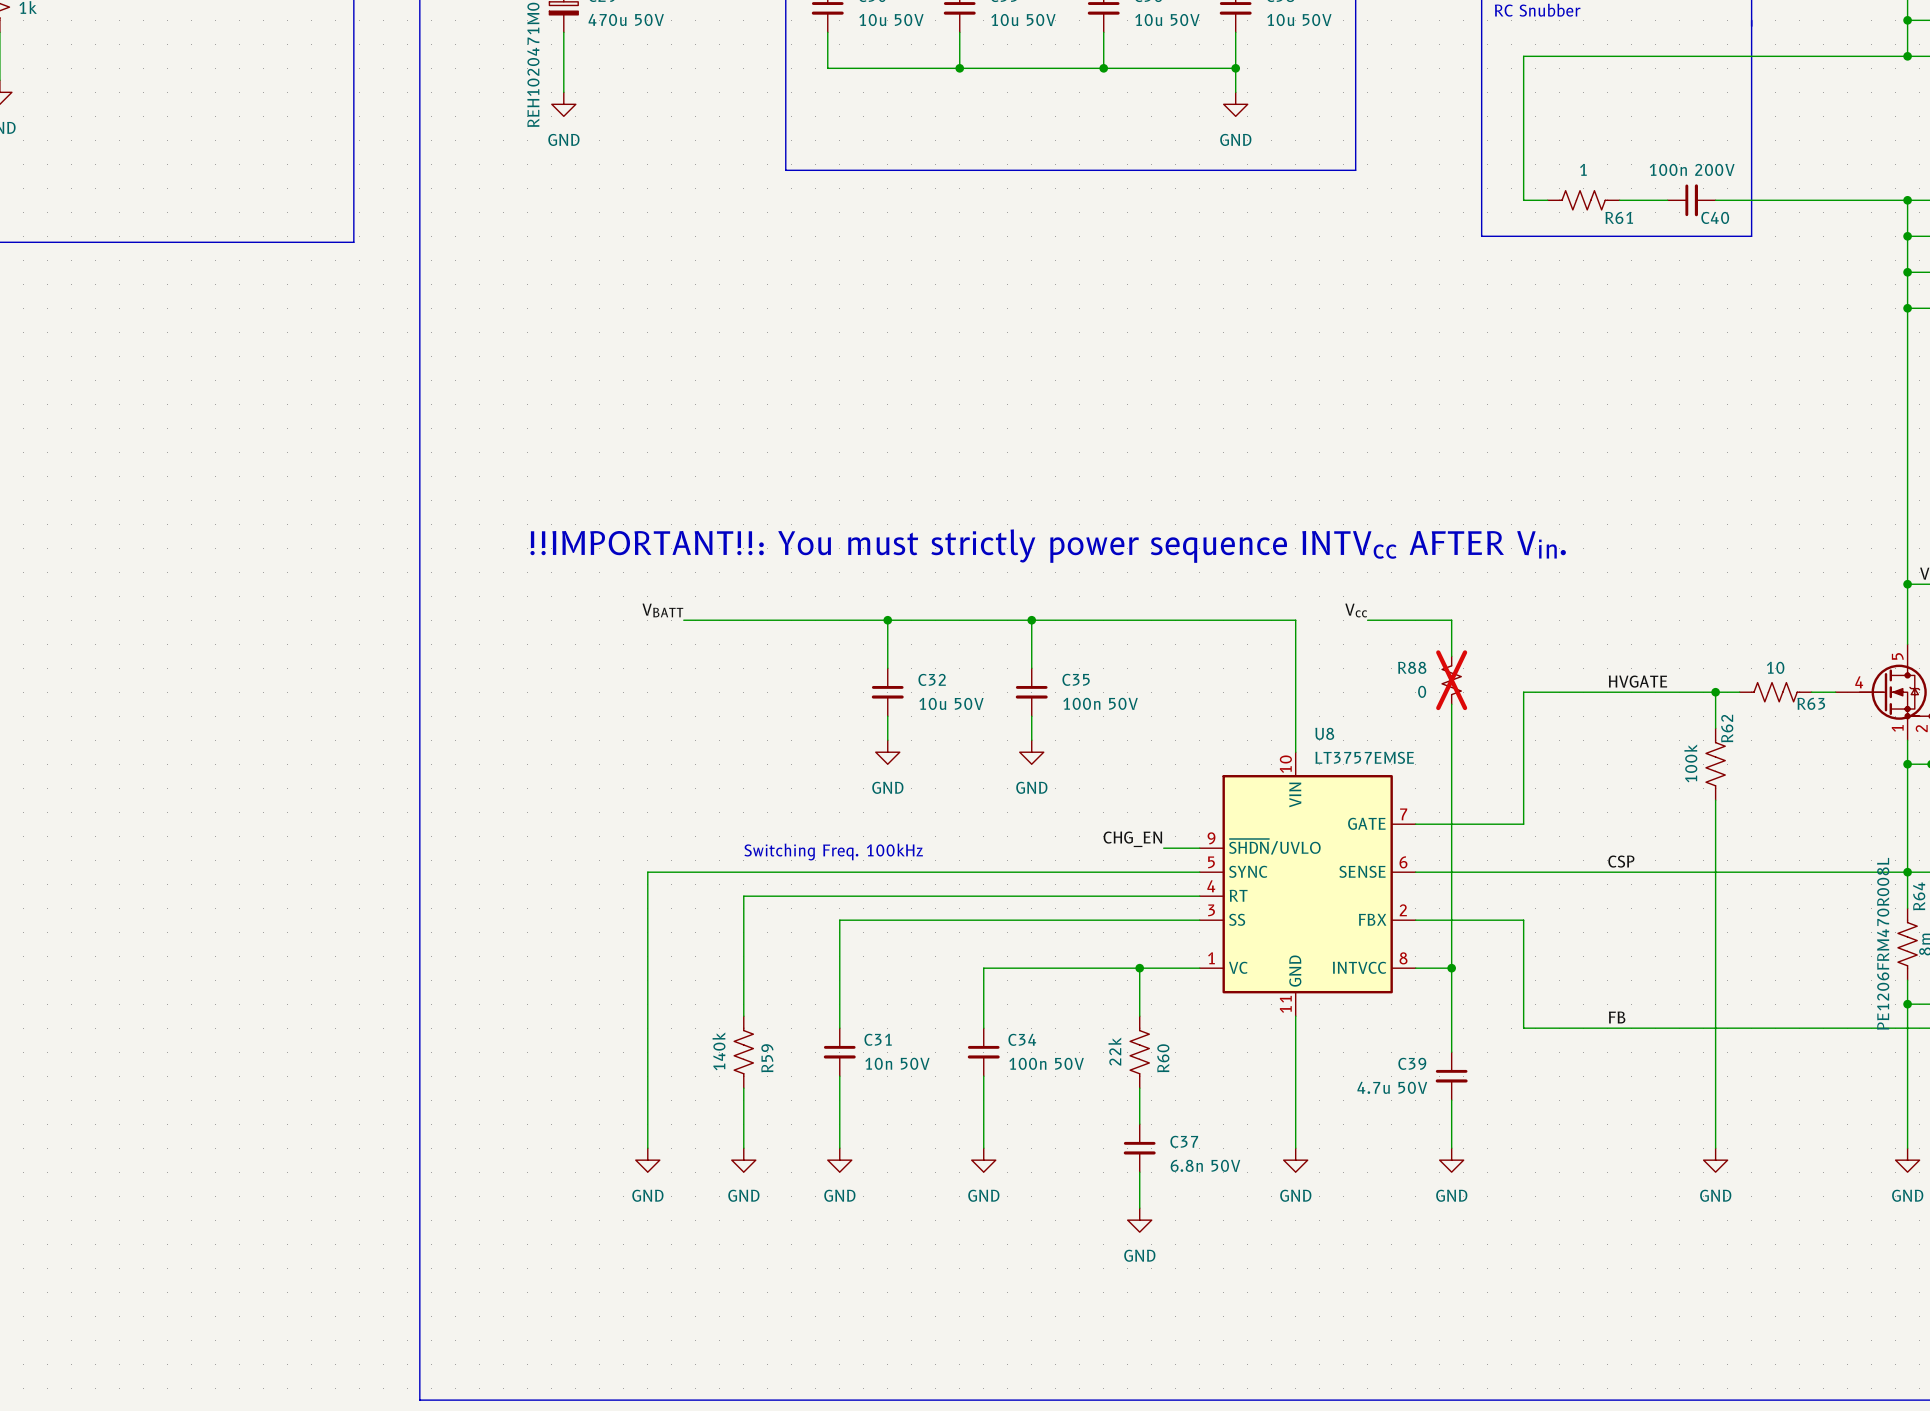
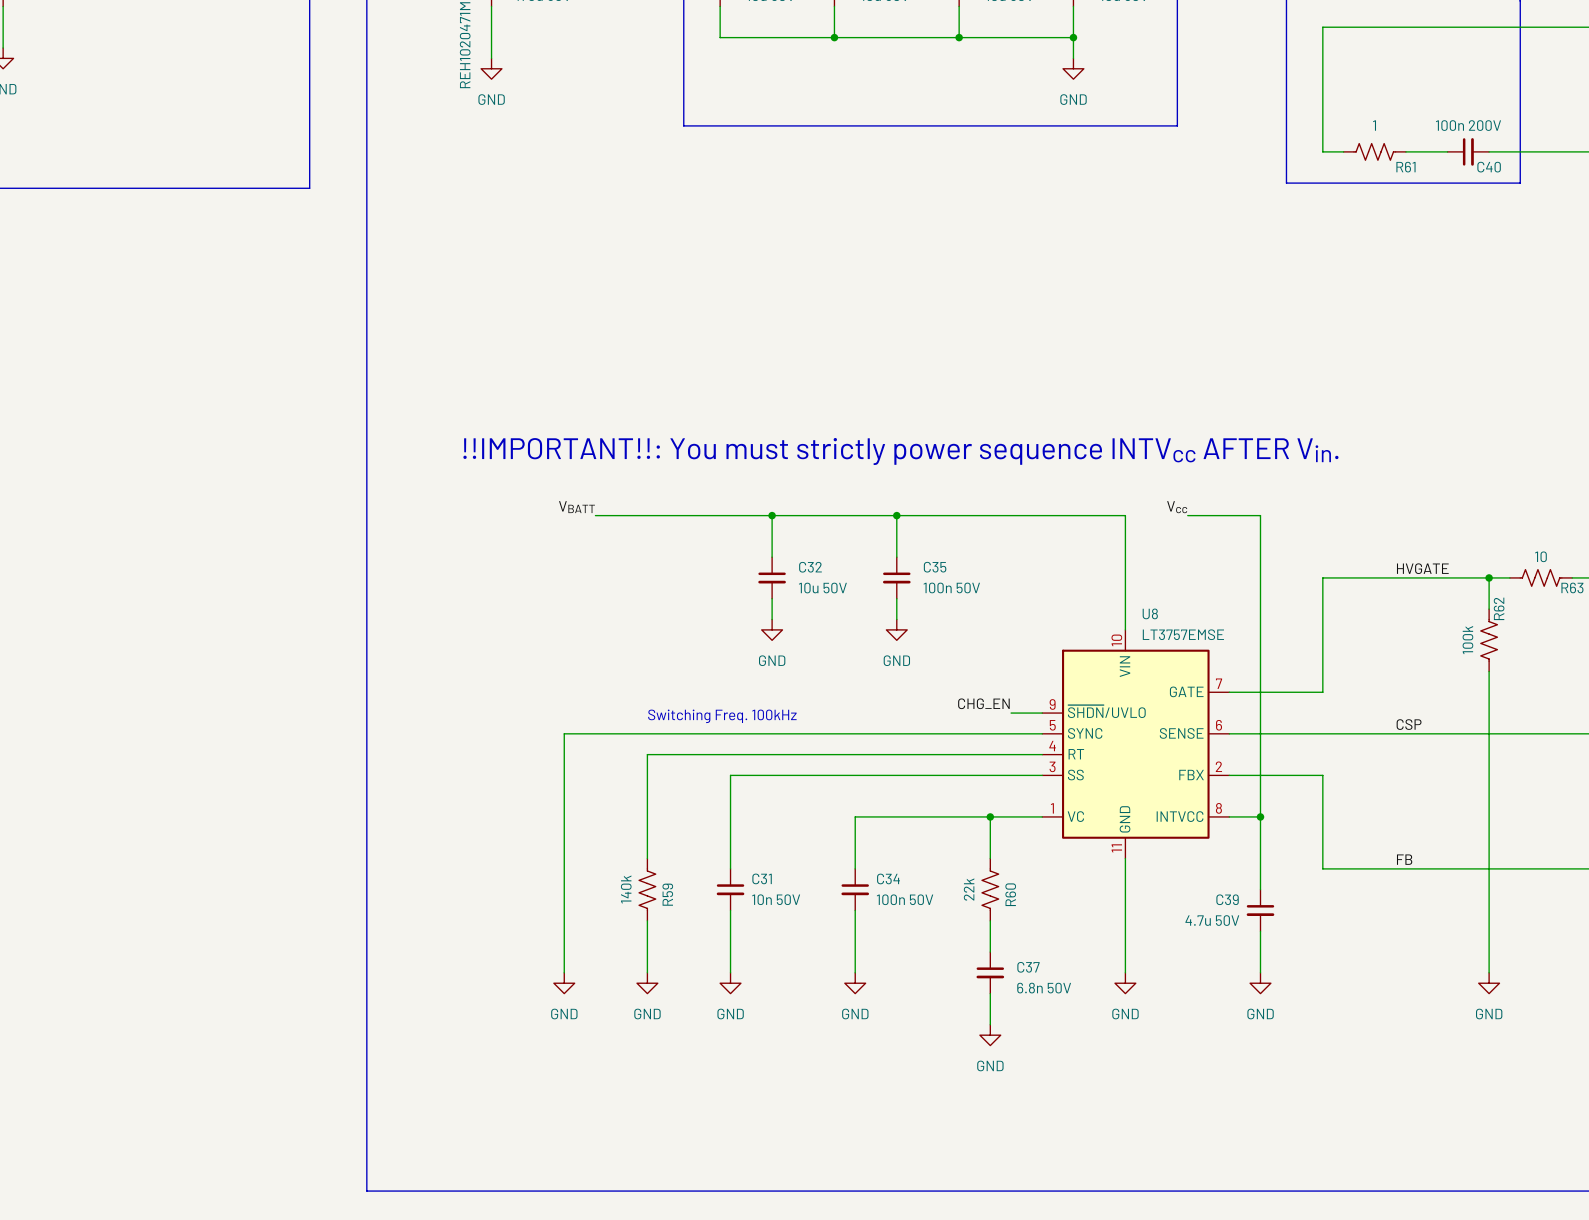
R88: 0 (1451, 680) -> none

